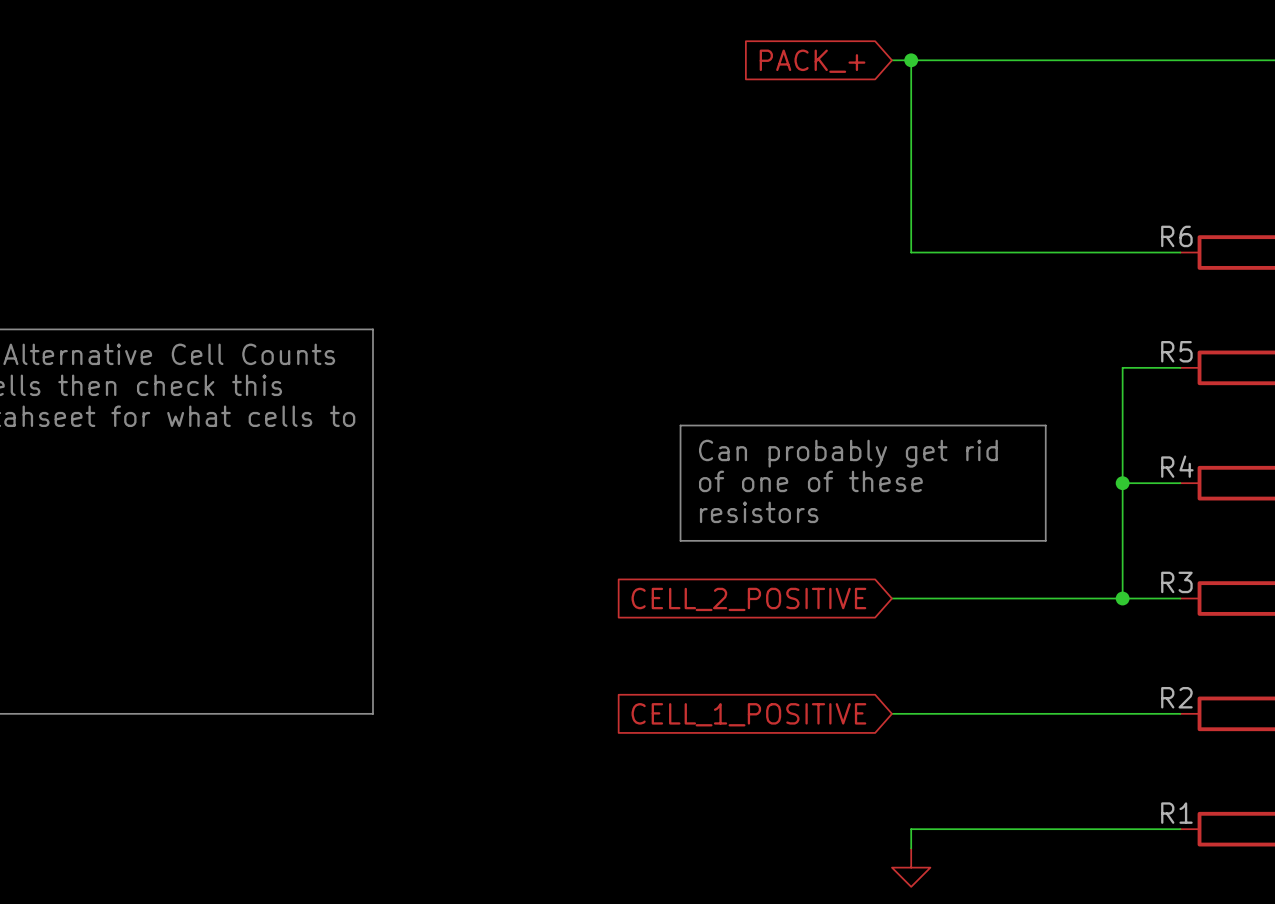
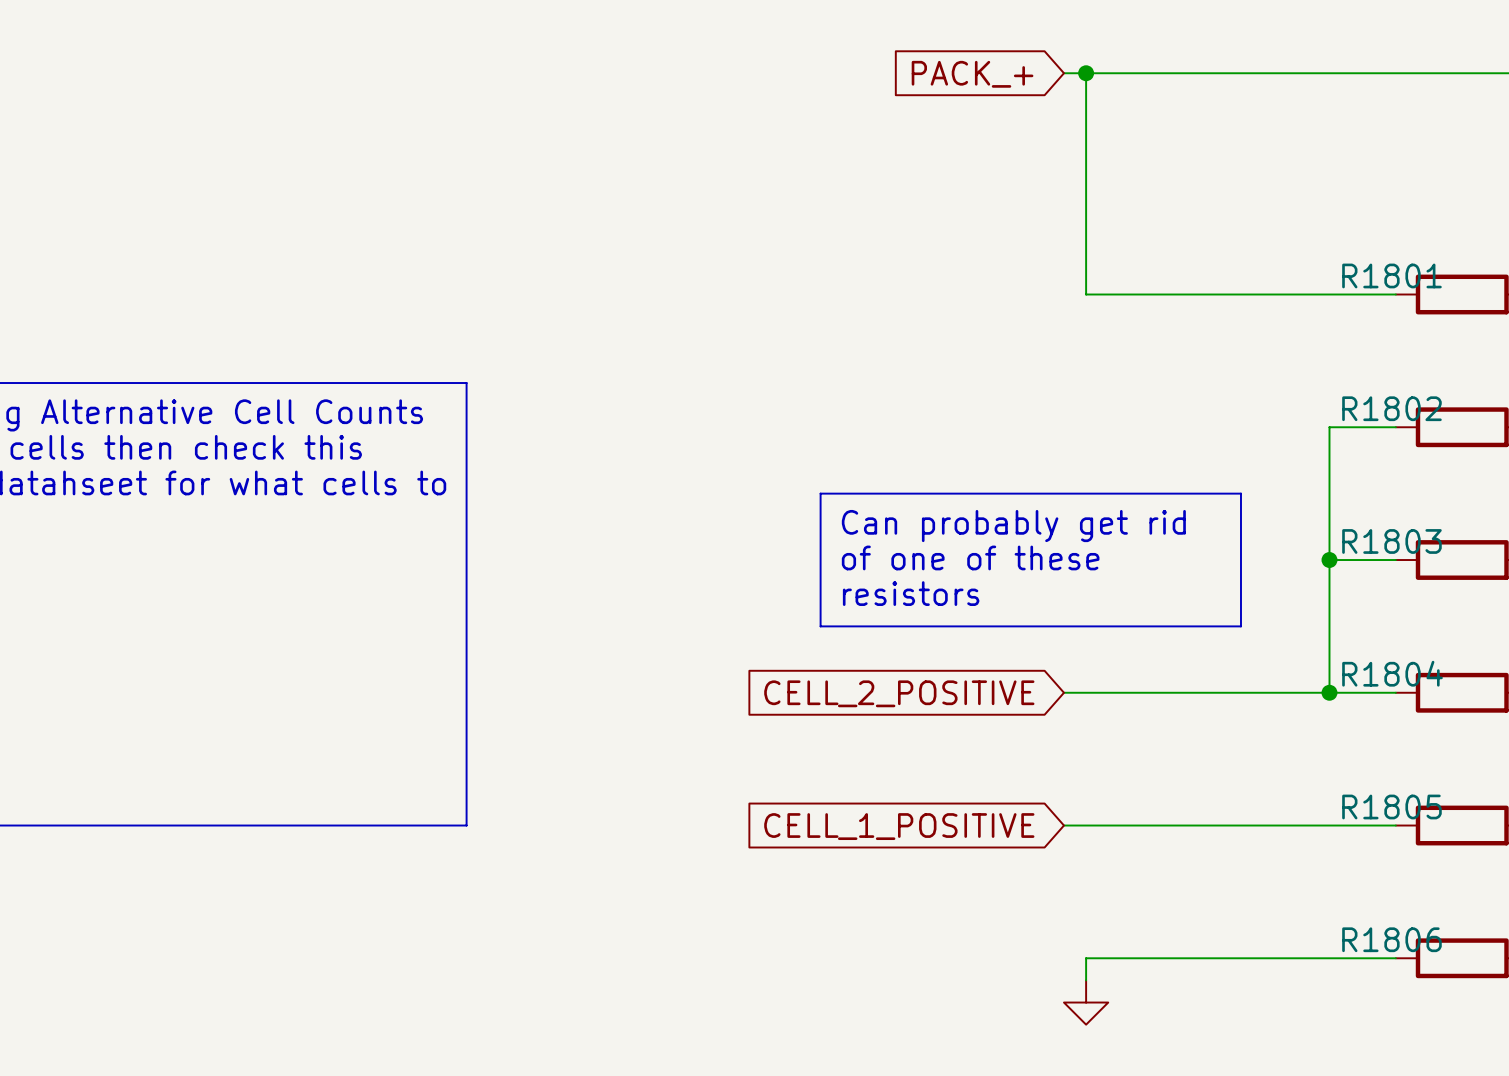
R6 name: R6 (1176, 236) -> R1801 (1391, 275)
R5 name: R5 (1176, 351) -> R1802 (1391, 408)
R4 name: R4 (1177, 466) -> R1803 (1391, 541)
R3 name: R3 (1176, 582) -> R1804 (1392, 673)
R2 name: R2 (1176, 697) -> R1805 (1391, 806)
R1 name: R1 (1176, 813) -> R1806 (1391, 939)

